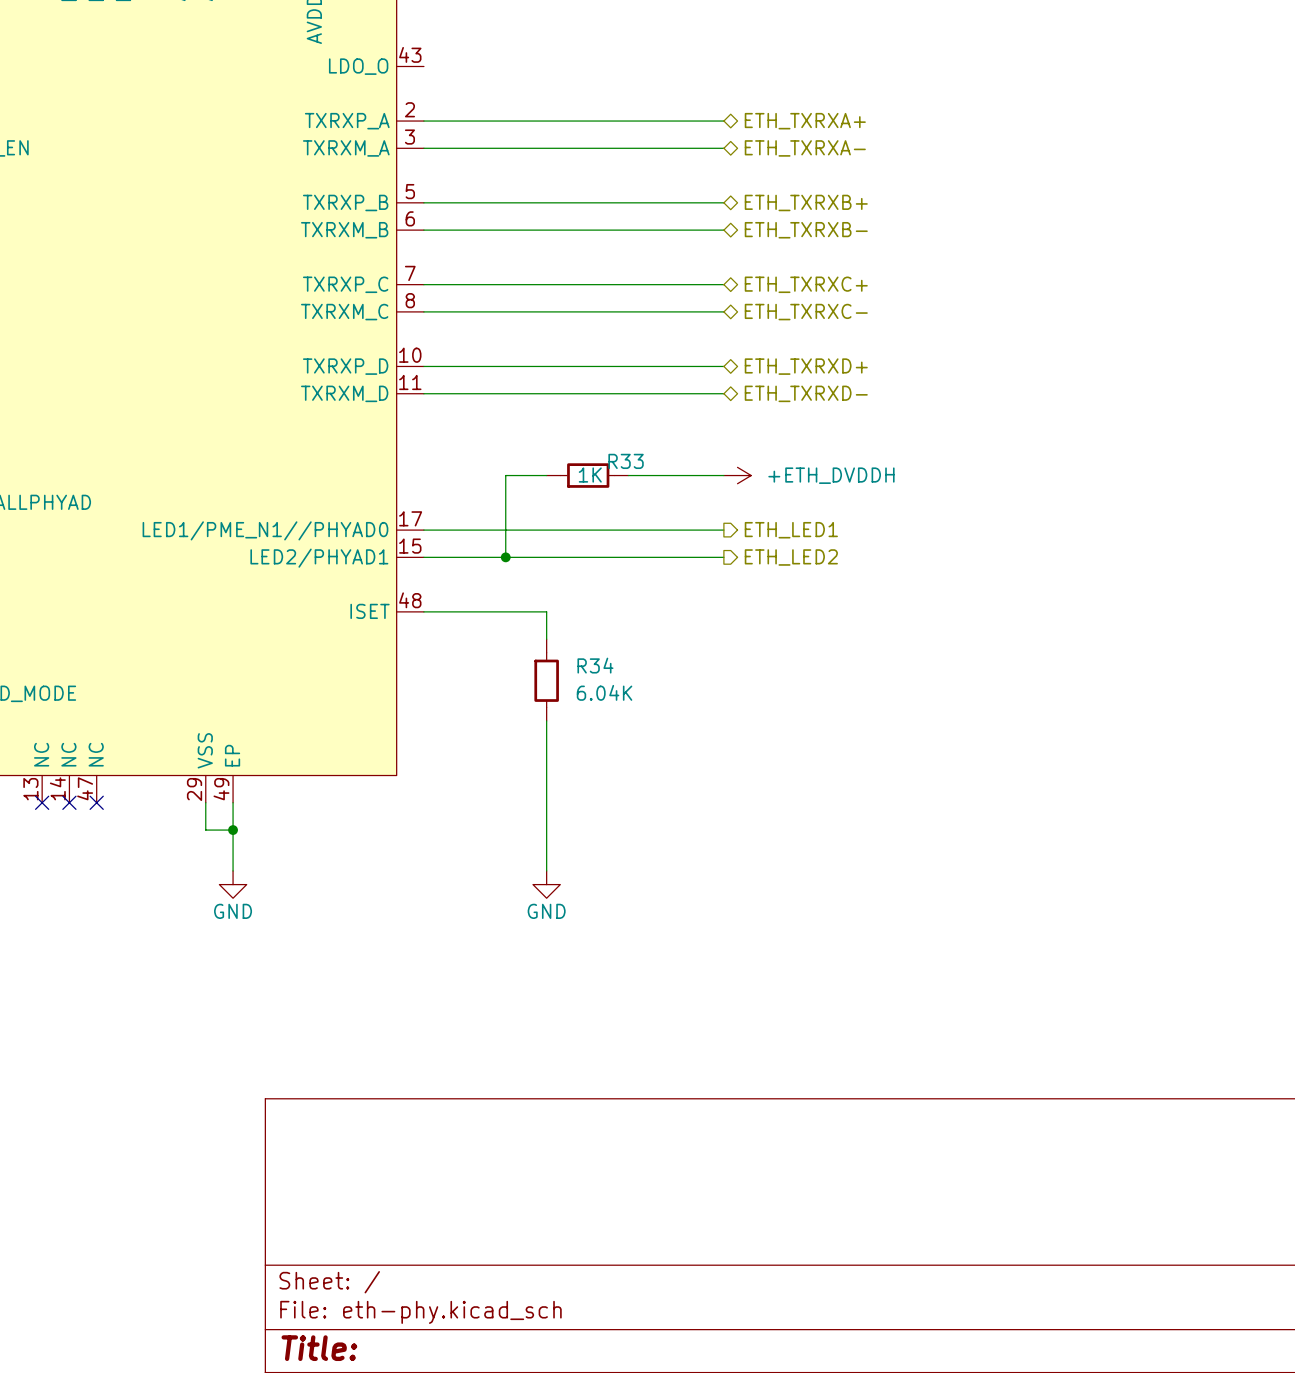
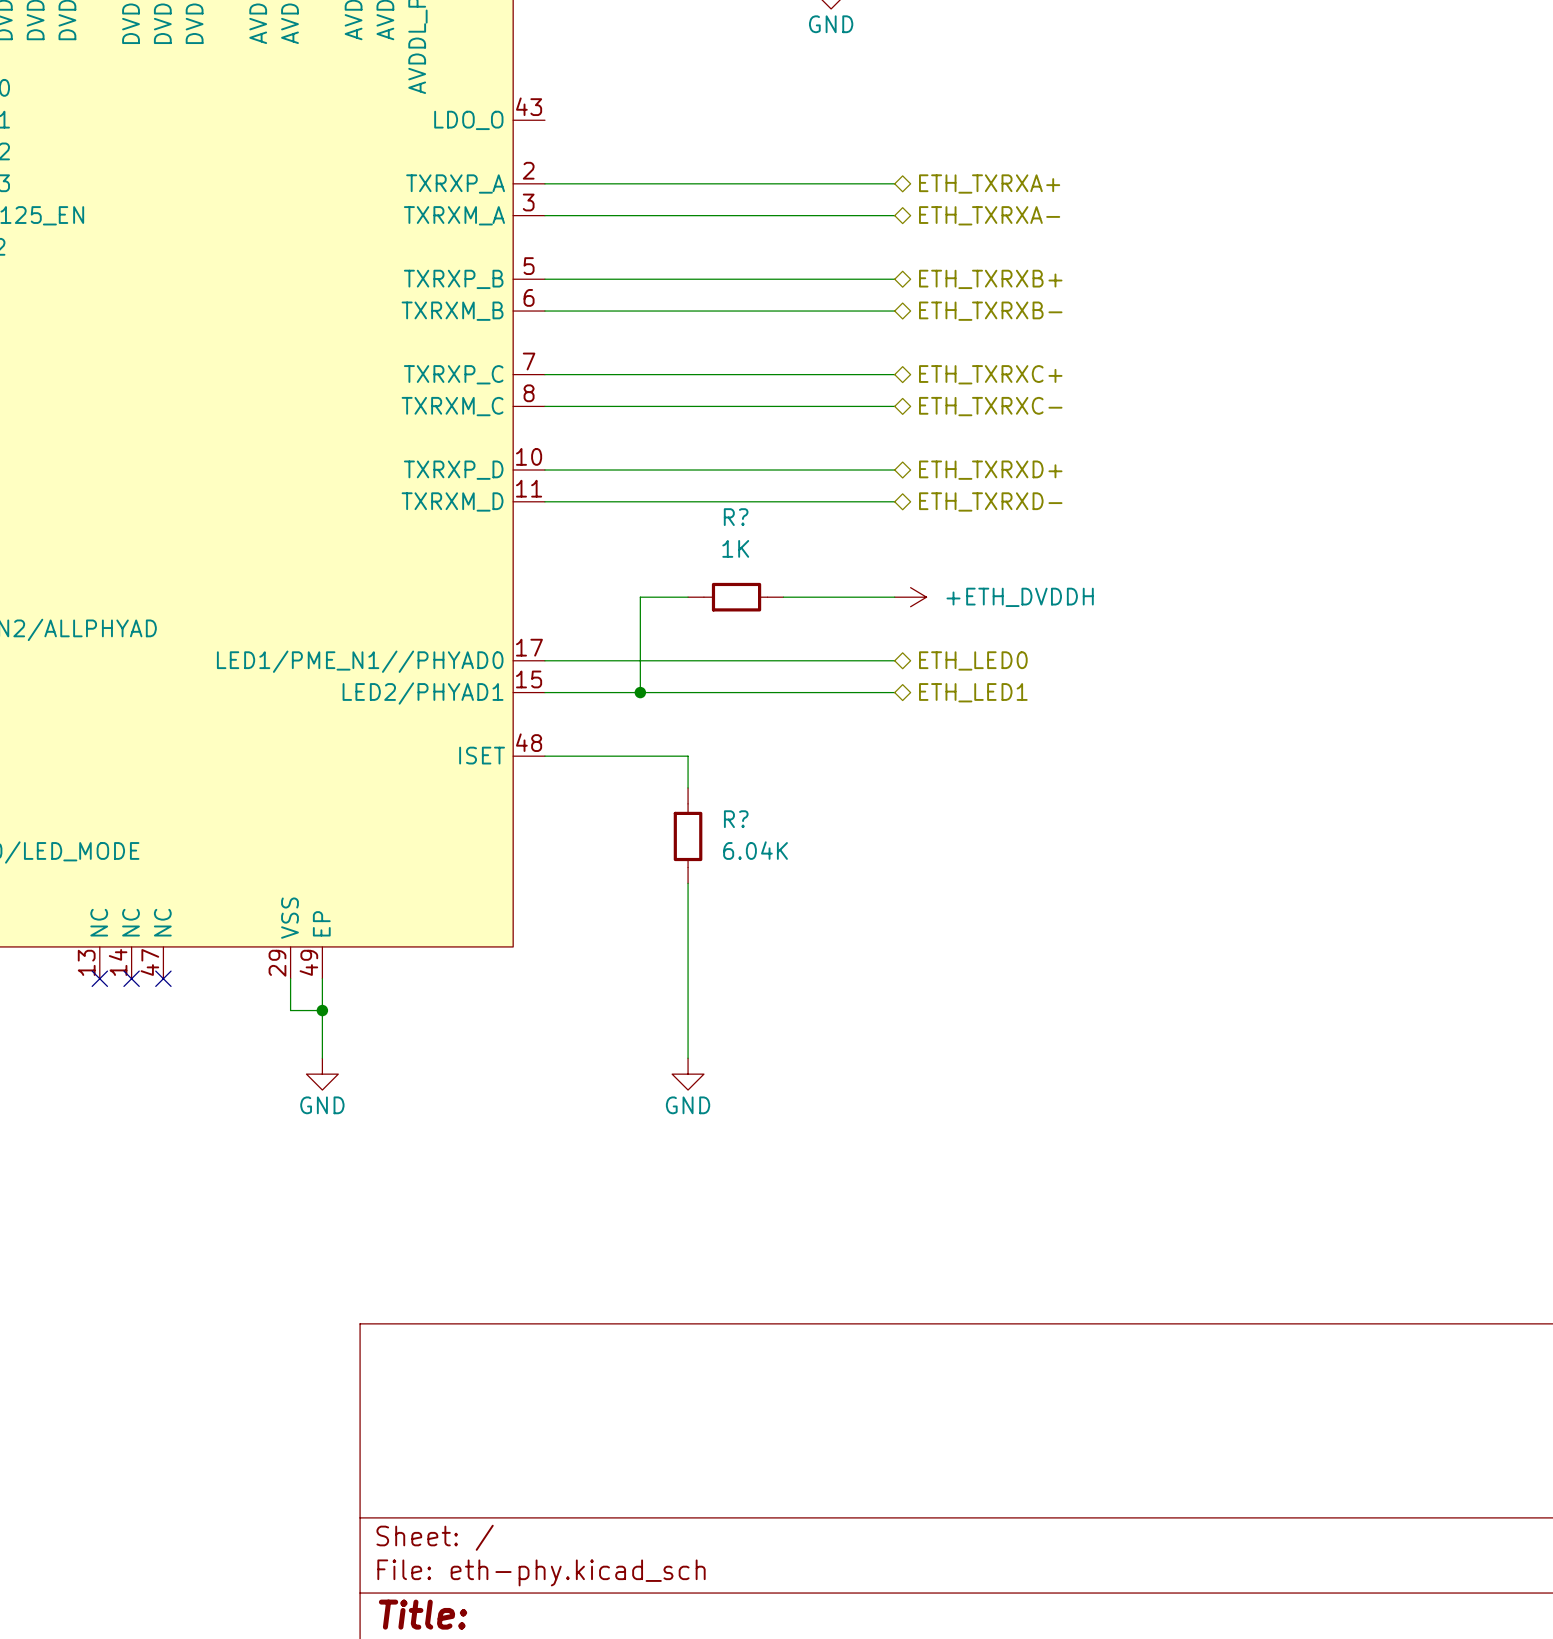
R33 name: R33 (626, 461) -> R? (736, 517)
R33 text position: 1K (590, 475) -> 1K (735, 548)
hierarchical label shape: output (791, 530) -> bidirectional (973, 660)
hierarchical label: ETH_LED1 (791, 530) -> ETH_LED0 (973, 660)
hierarchical label shape: output (791, 557) -> bidirectional (973, 692)
hierarchical label: ETH_LED2 (791, 557) -> ETH_LED1 (973, 692)
R34 name: R34 (595, 665) -> R? (736, 819)

